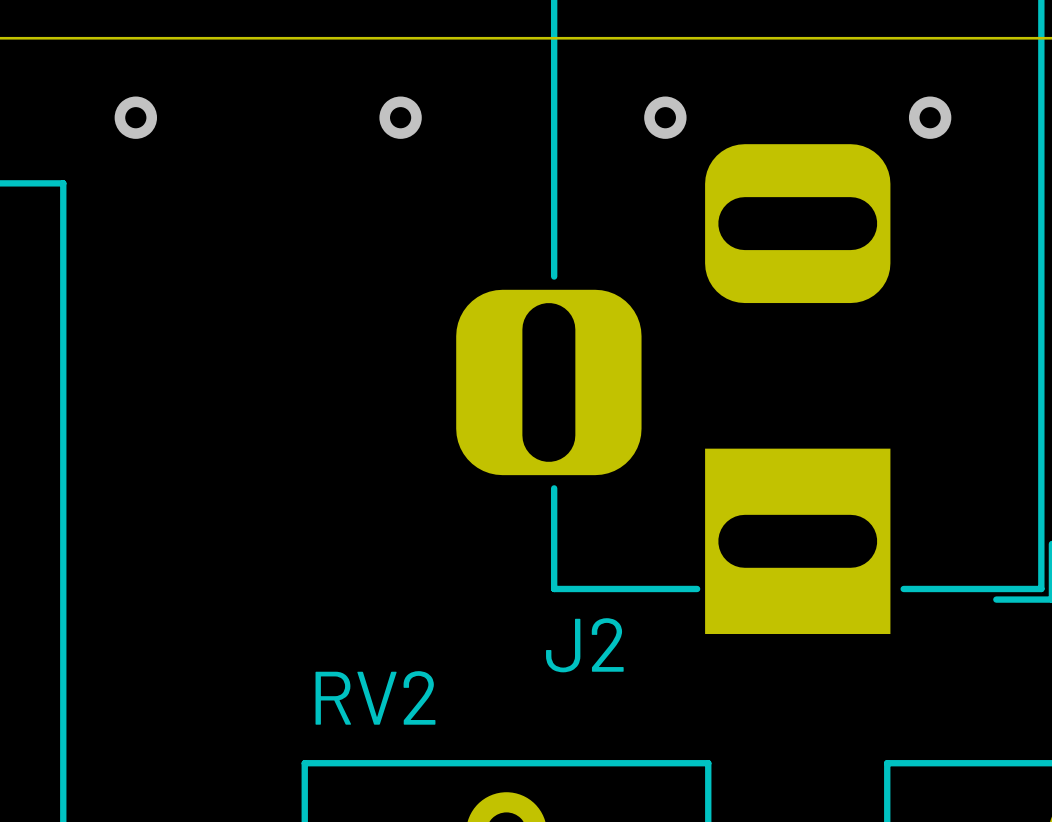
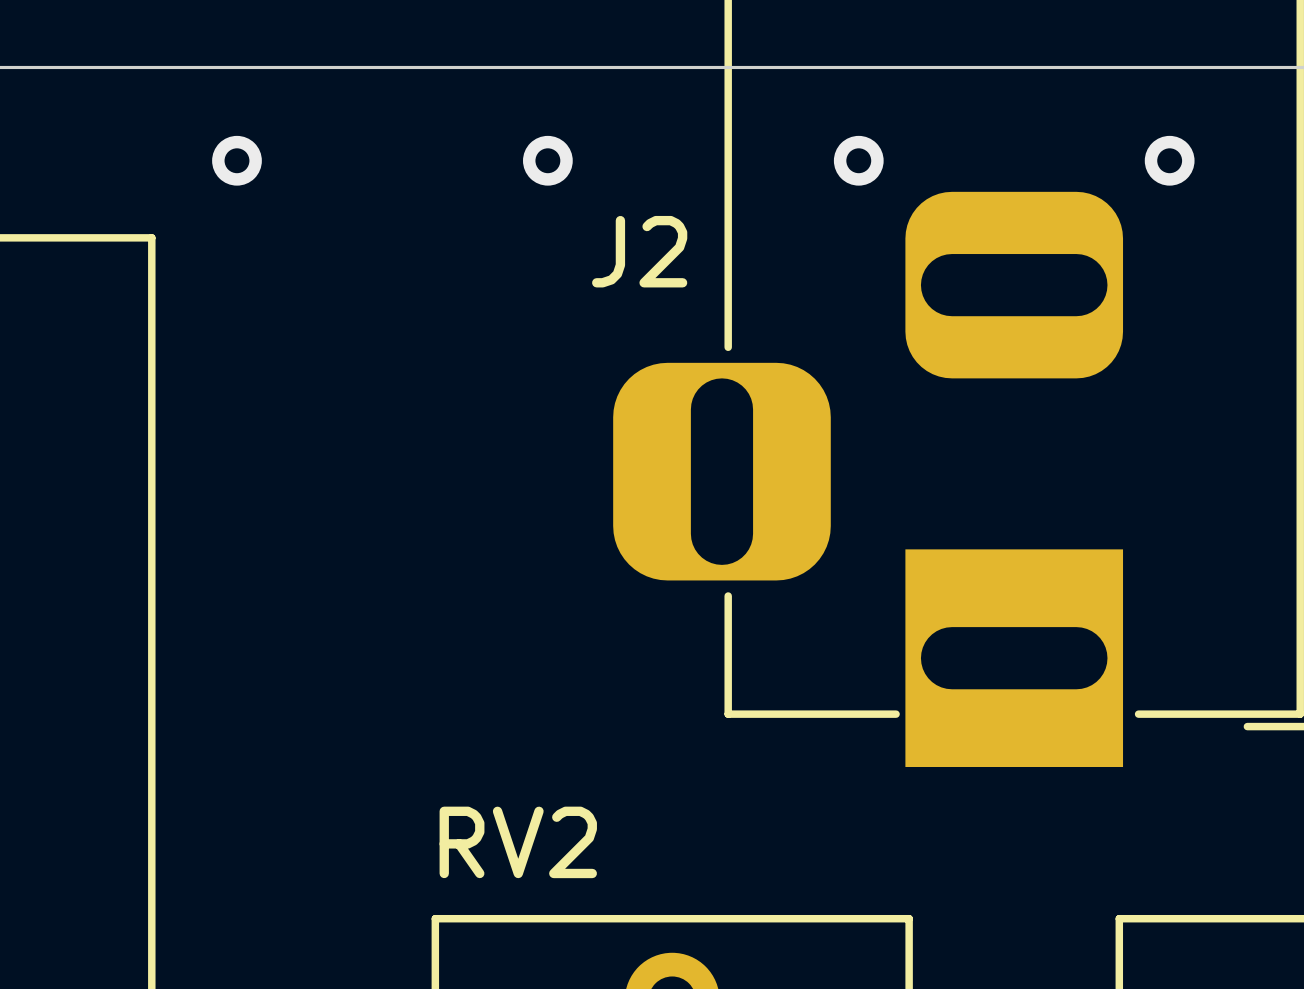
J2 name position: J2 (584, 645) -> J2 (639, 251)

